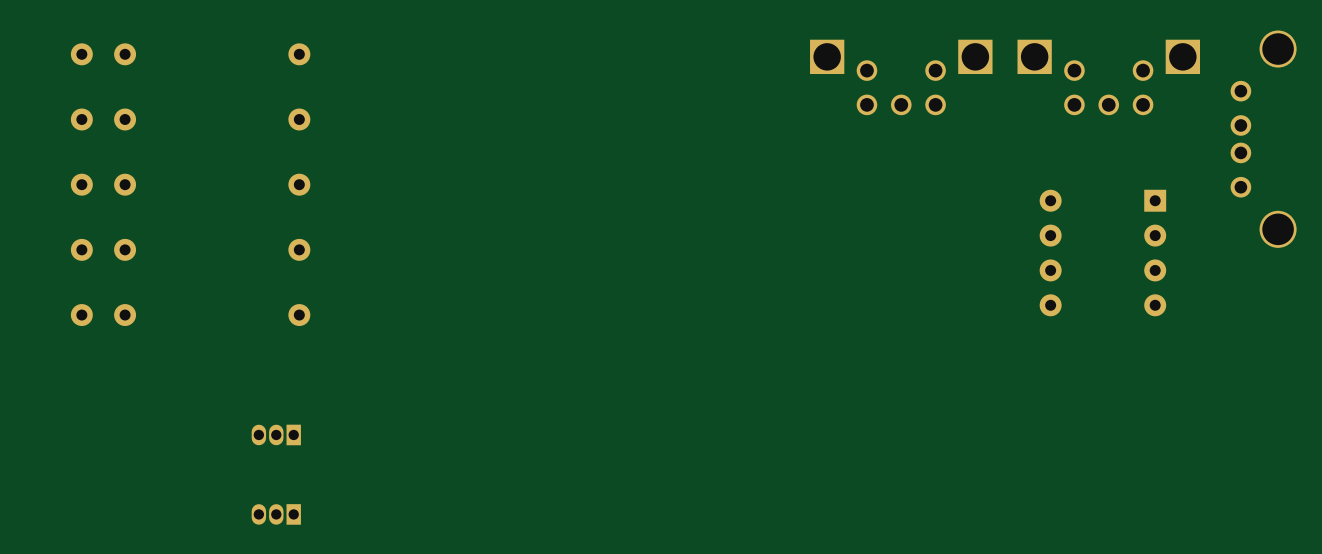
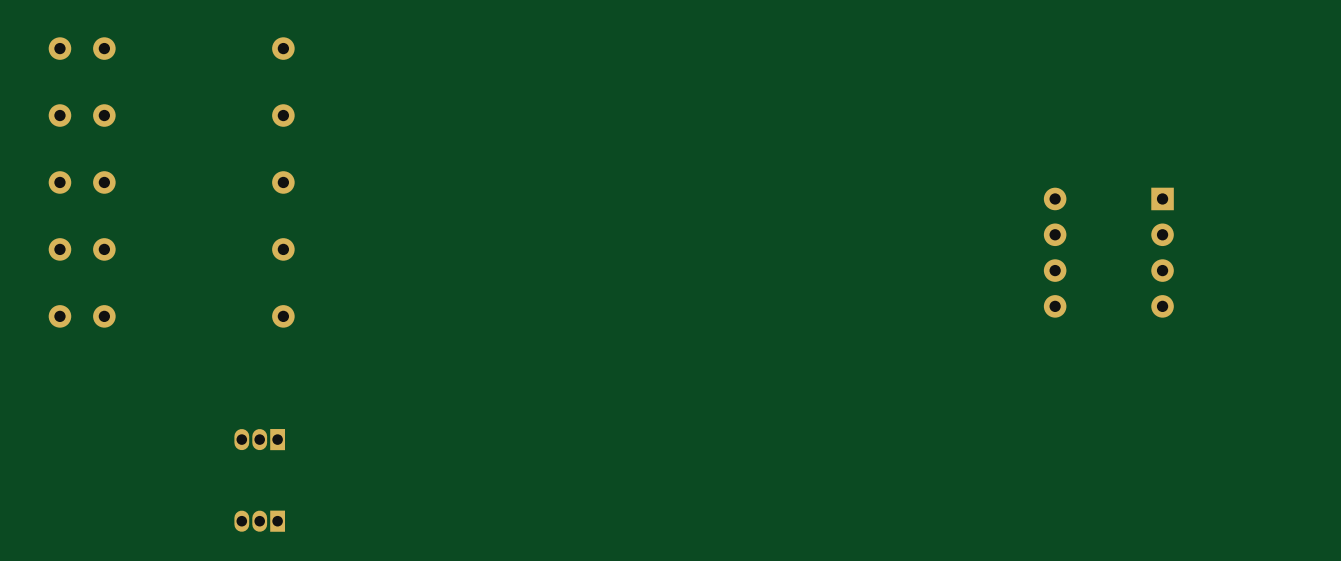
part: (901, 77) -> none
part: (1108, 77) -> none
part: (1263, 139) -> none

